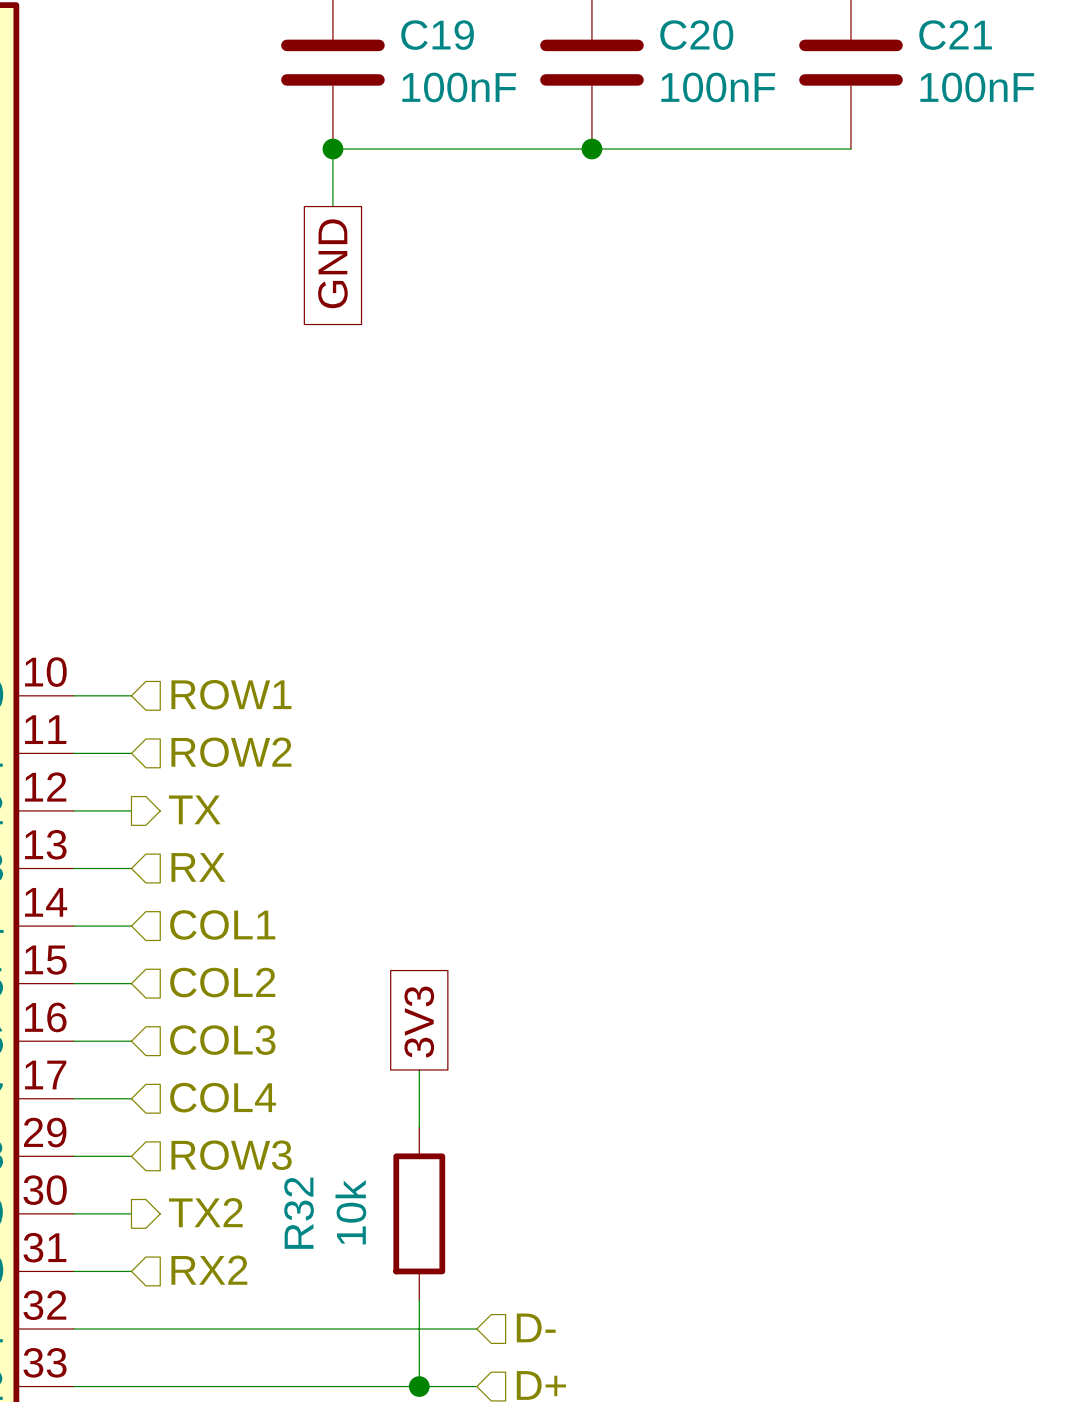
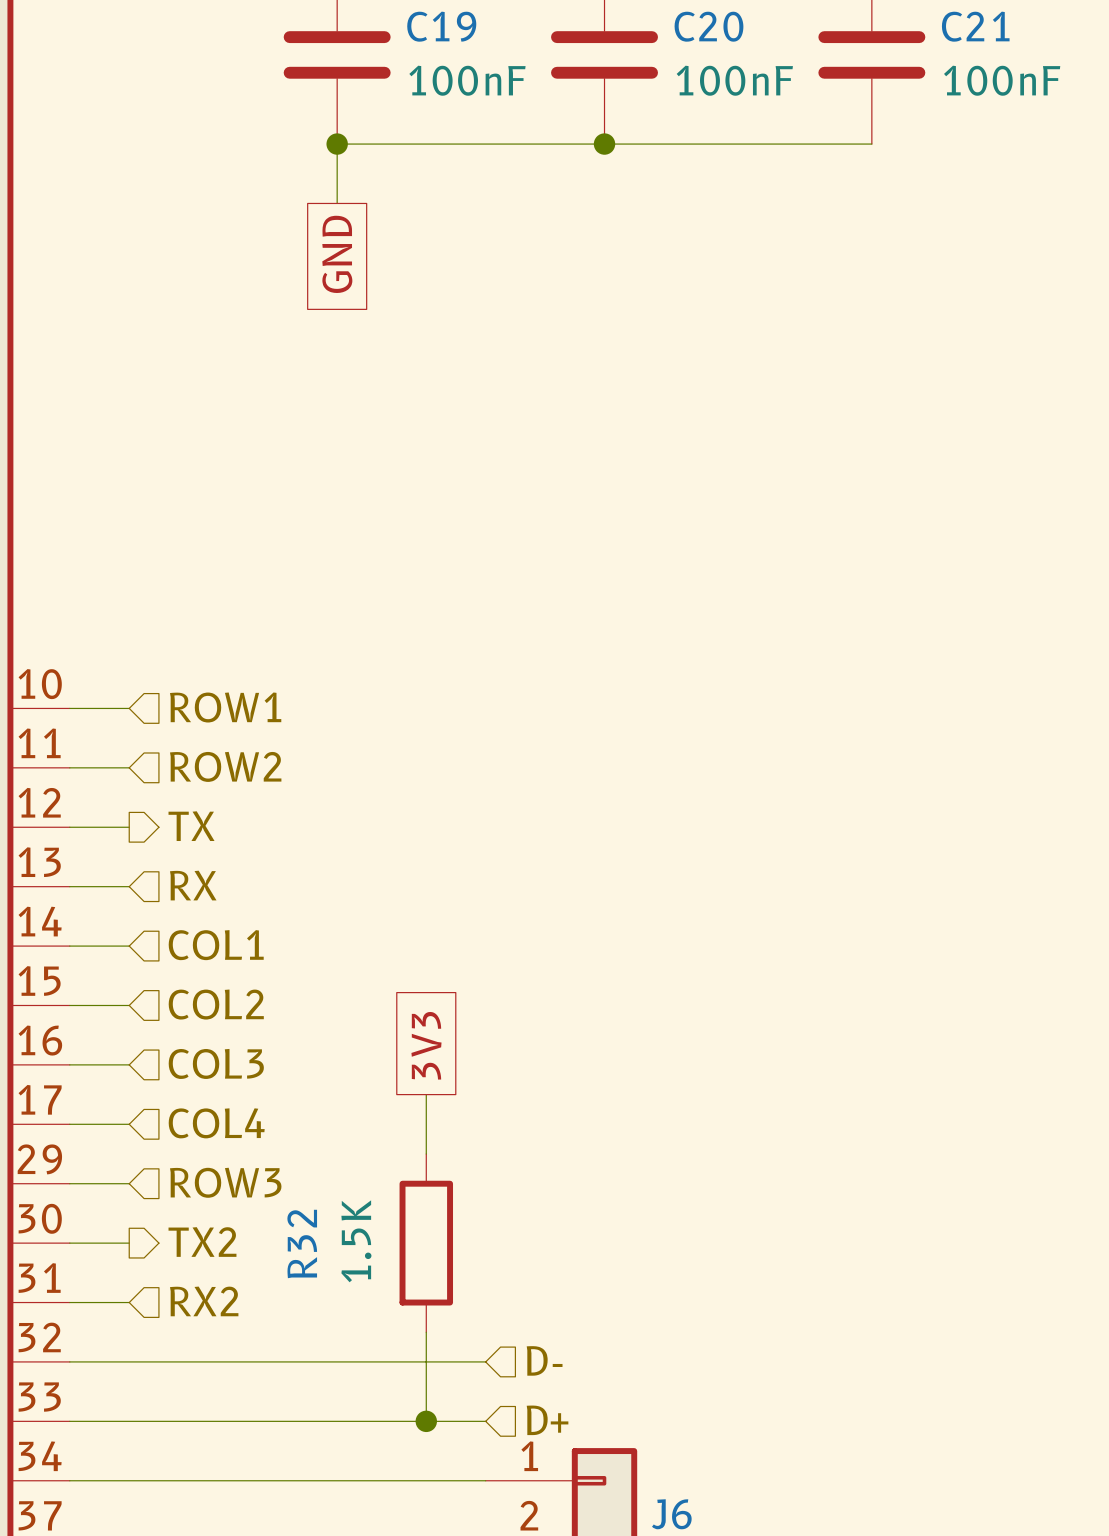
R32 value: 10k (350, 1212) -> 1.5K (356, 1241)

